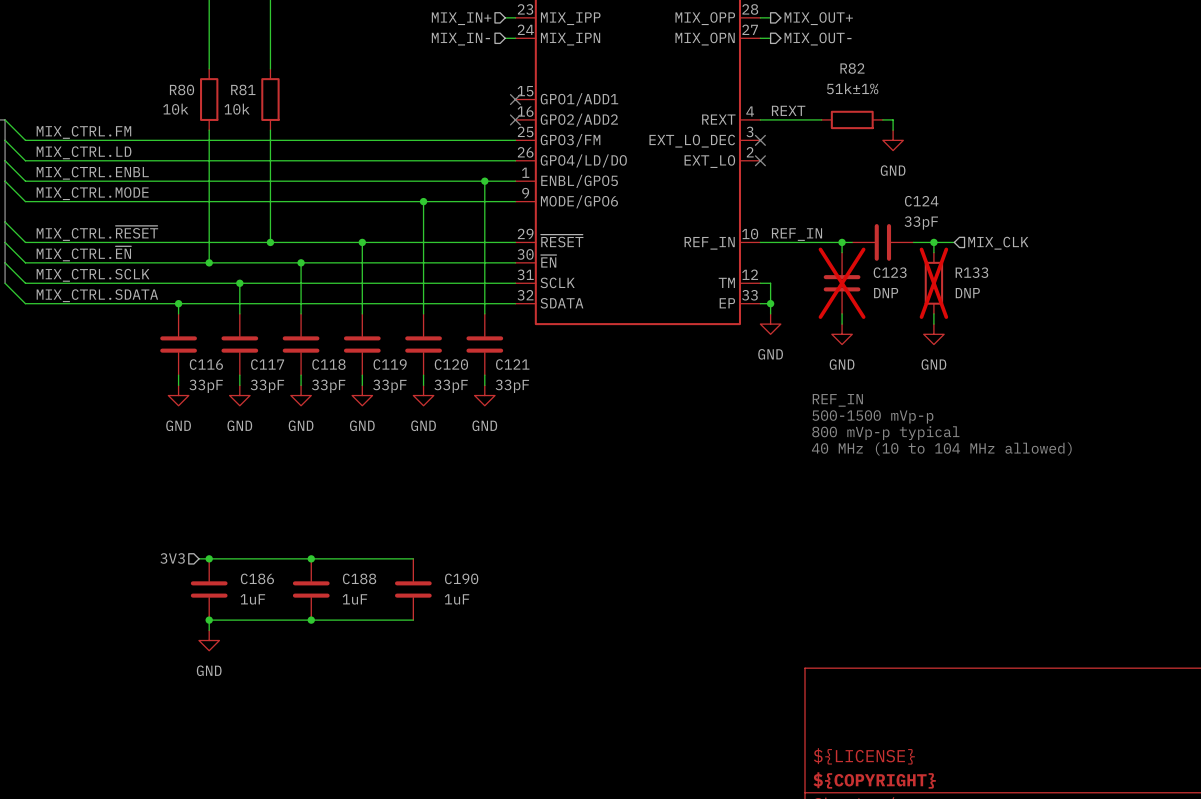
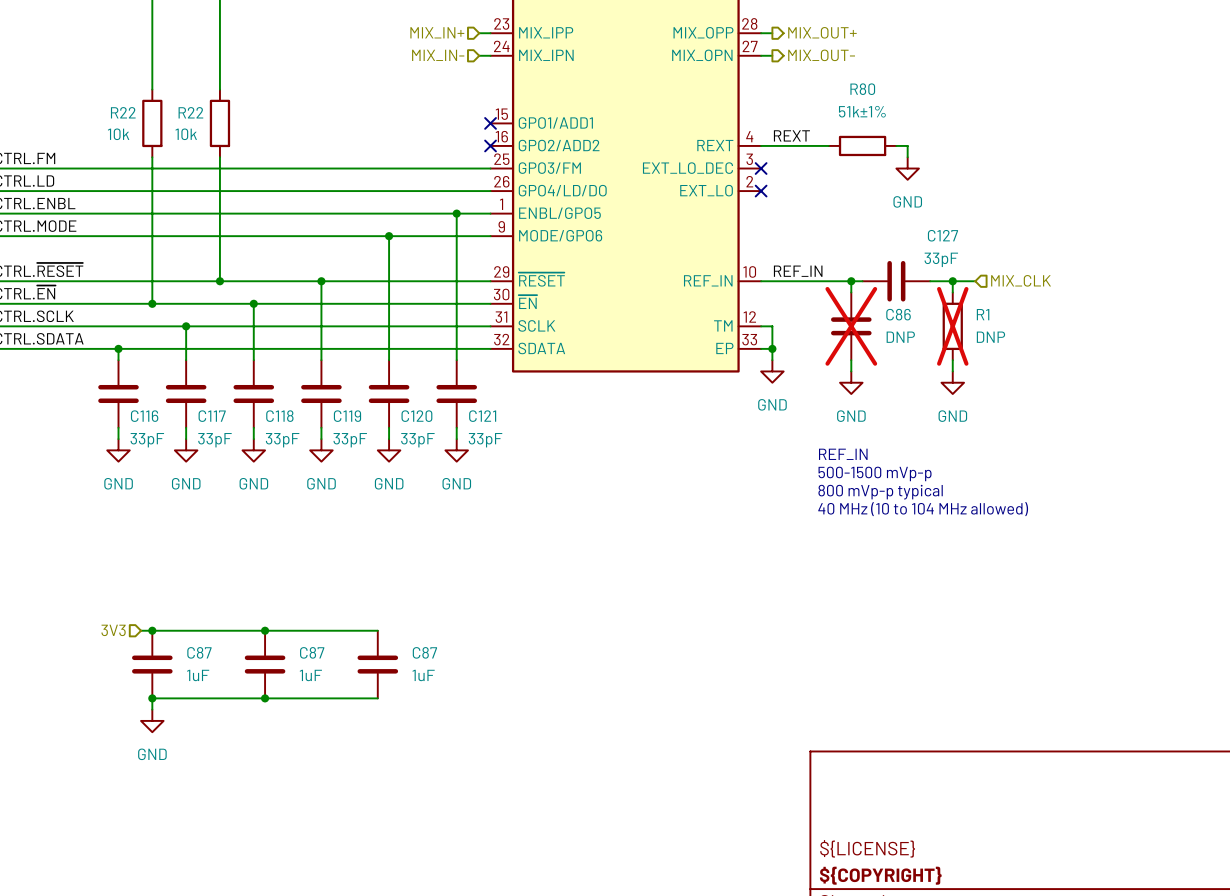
R82 name: R82 (852, 68) -> R80 (862, 89)
R80 name: R80 (182, 89) -> R22 (123, 112)
R81 name: R81 (243, 89) -> R22 (190, 112)
C124 name: C124 (921, 201) -> C127 (942, 235)
C123 name: C123 (890, 272) -> C86 (898, 314)
R133 name: R133 (971, 272) -> R1 (983, 314)
C186 name: C186 (257, 578) -> C87 (199, 652)
C188 name: C188 (359, 578) -> C87 (312, 652)
C190 name: C190 (461, 578) -> C87 (424, 652)

